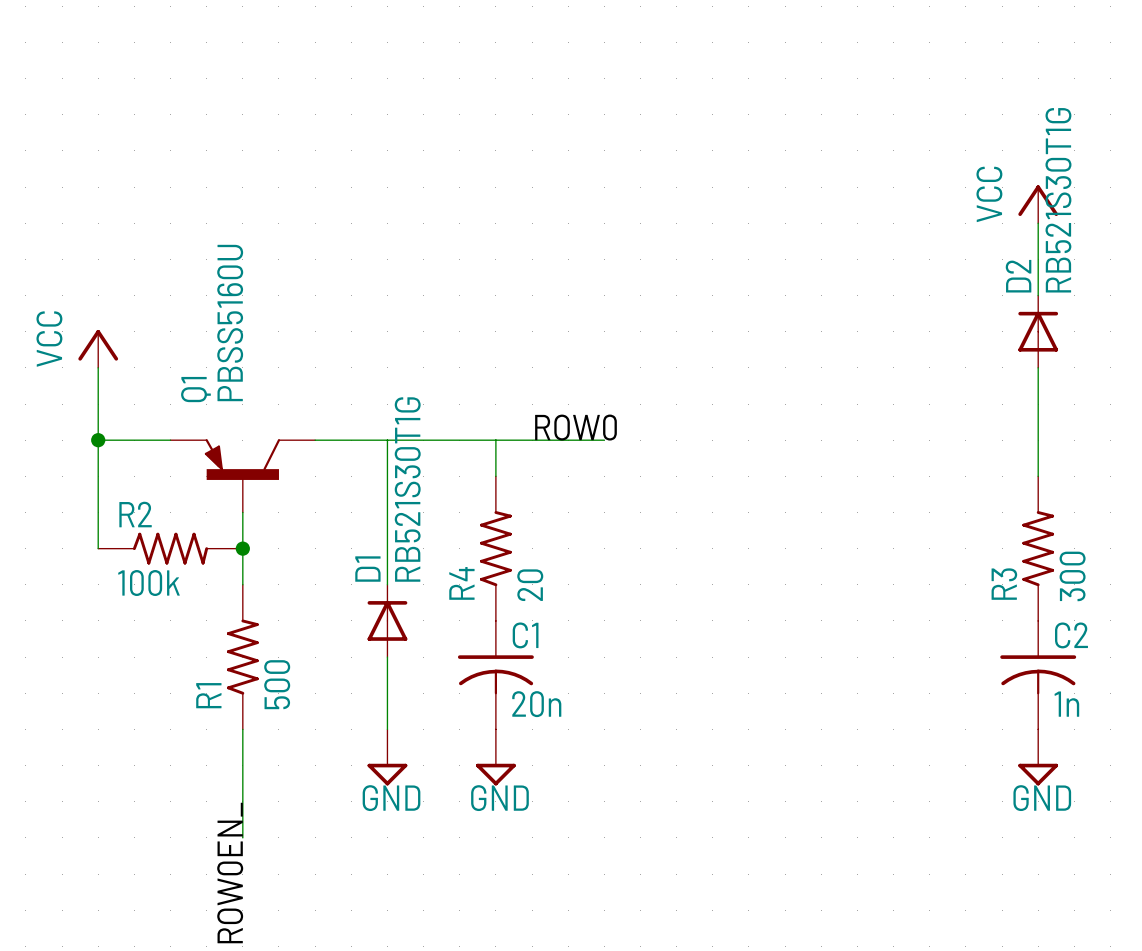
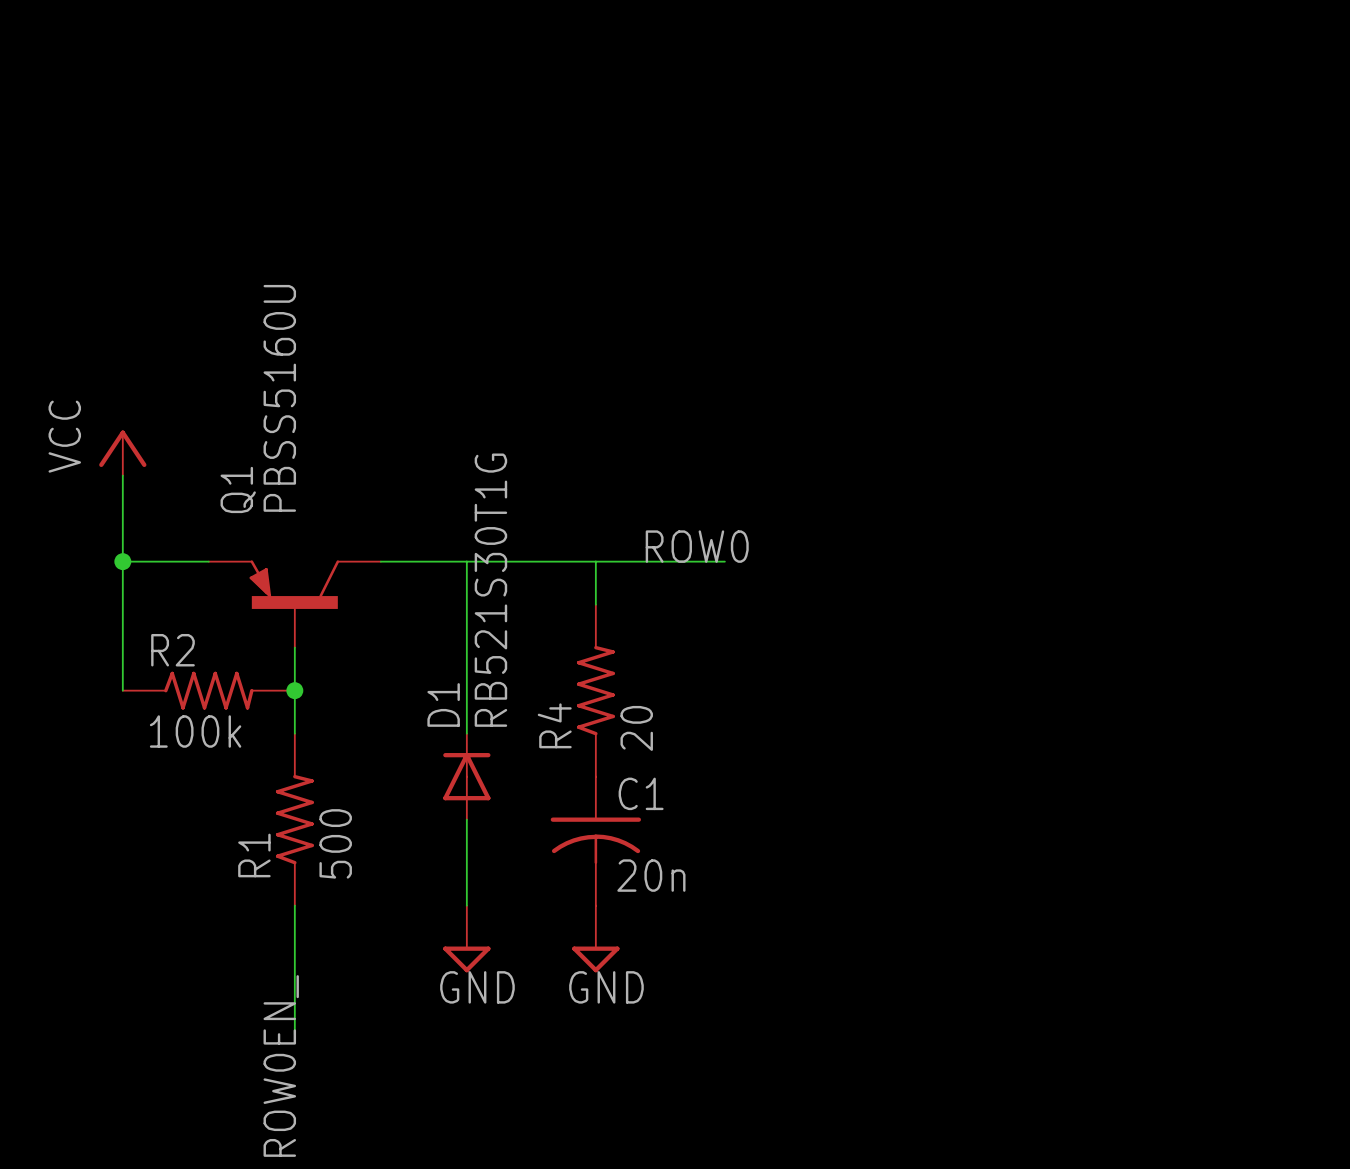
power symbol: VCC (1038, 204) -> none
wire: (1038, 223) (1038, 295) -> none
D2: RB521S30T1G (1038, 331) -> none
wire: (1038, 367) (1038, 476) -> none
R3: 300 (1038, 548) -> none
C2: 1n (1038, 675) -> none
power symbol: GND (1038, 757) -> none

